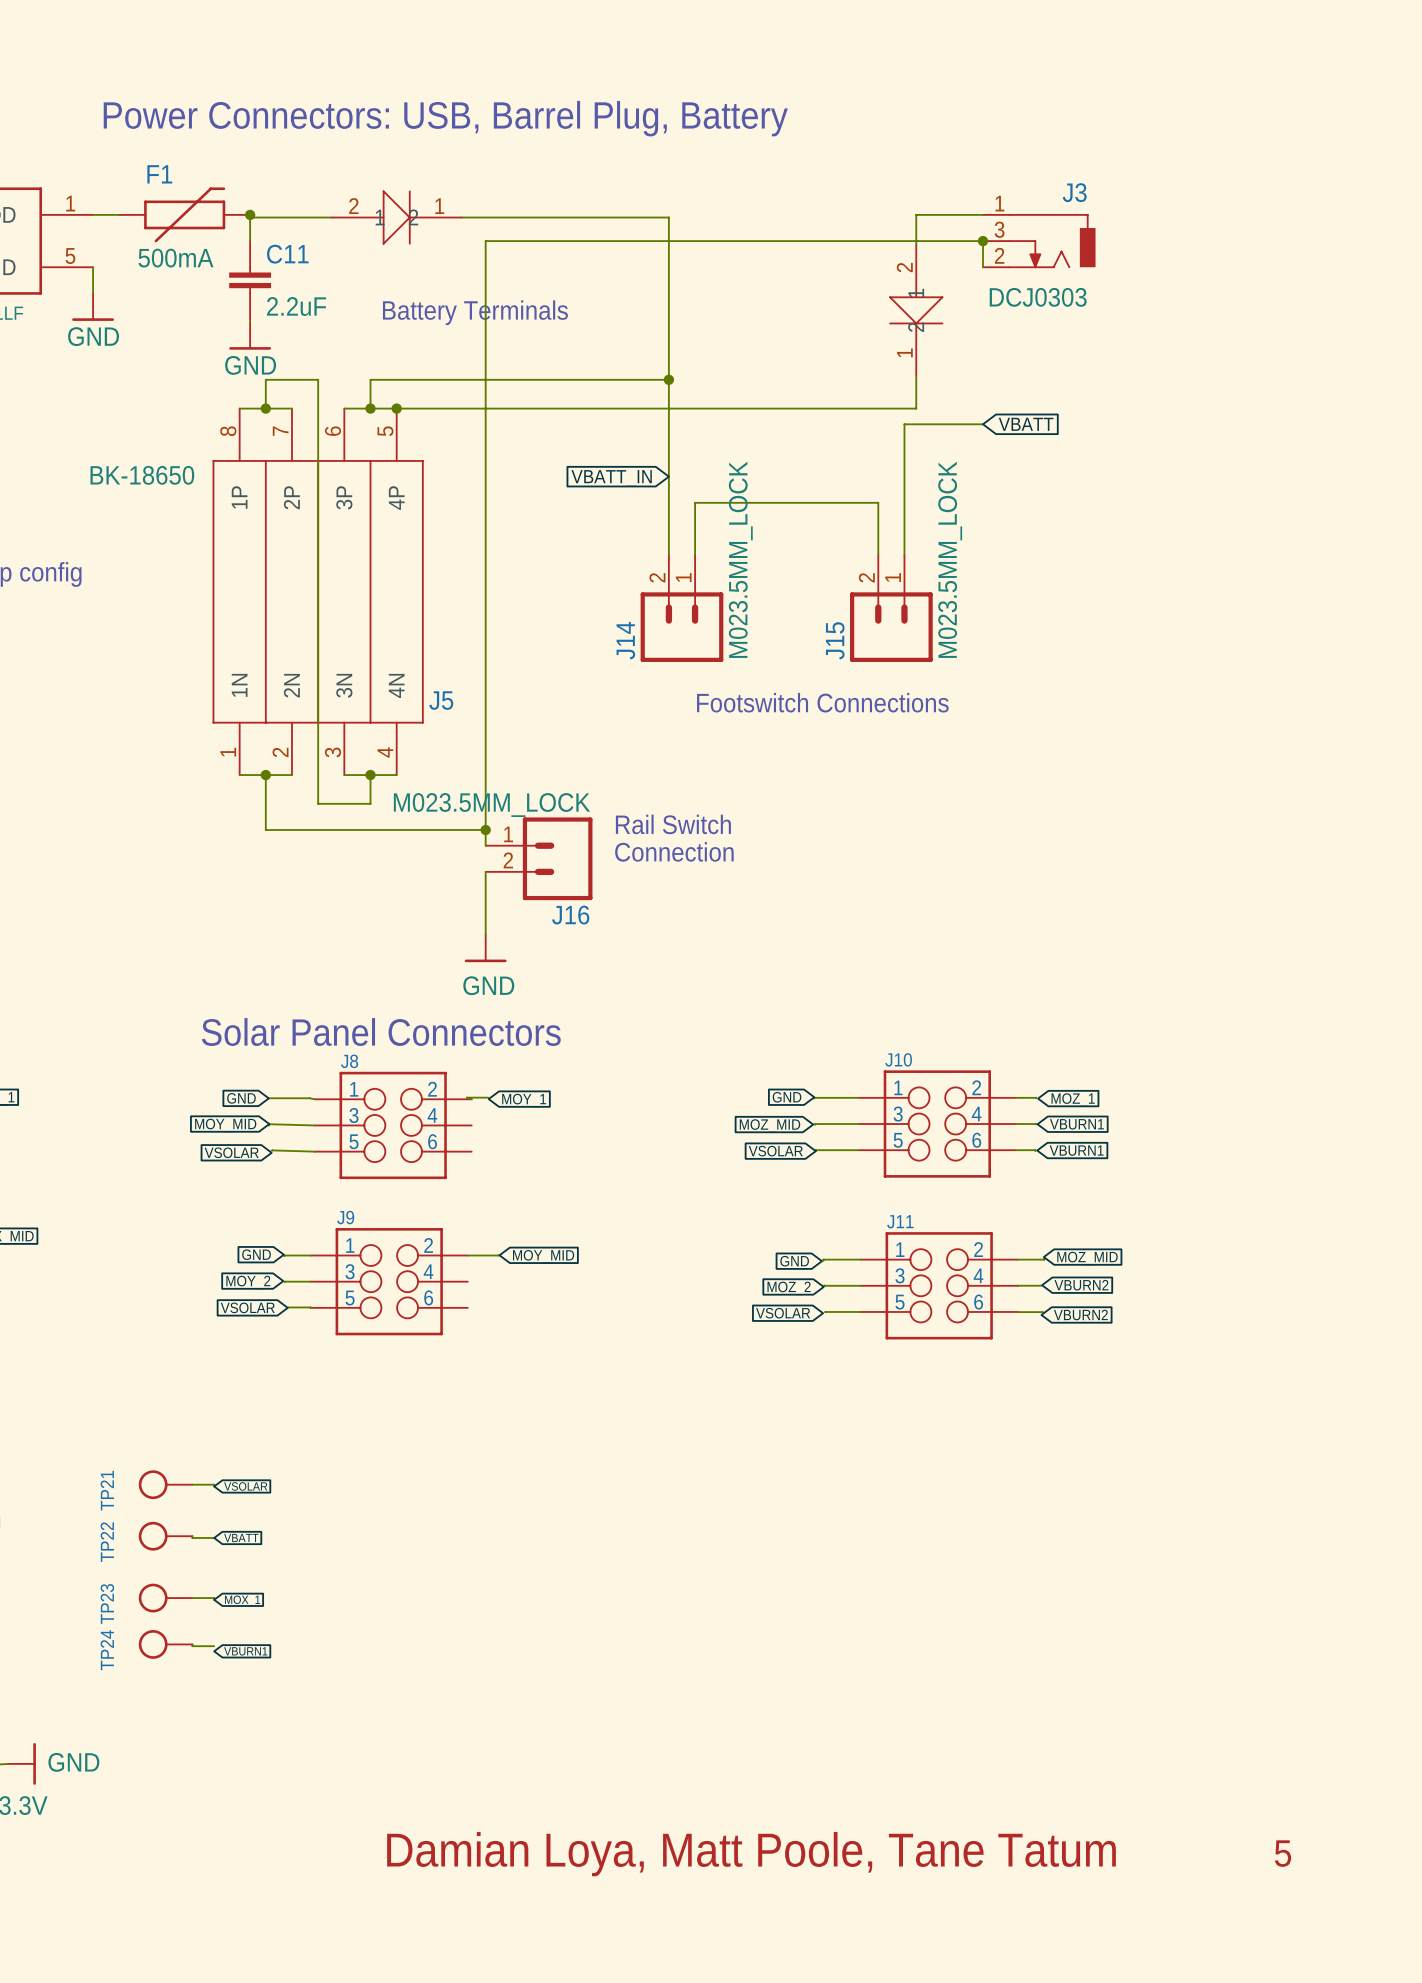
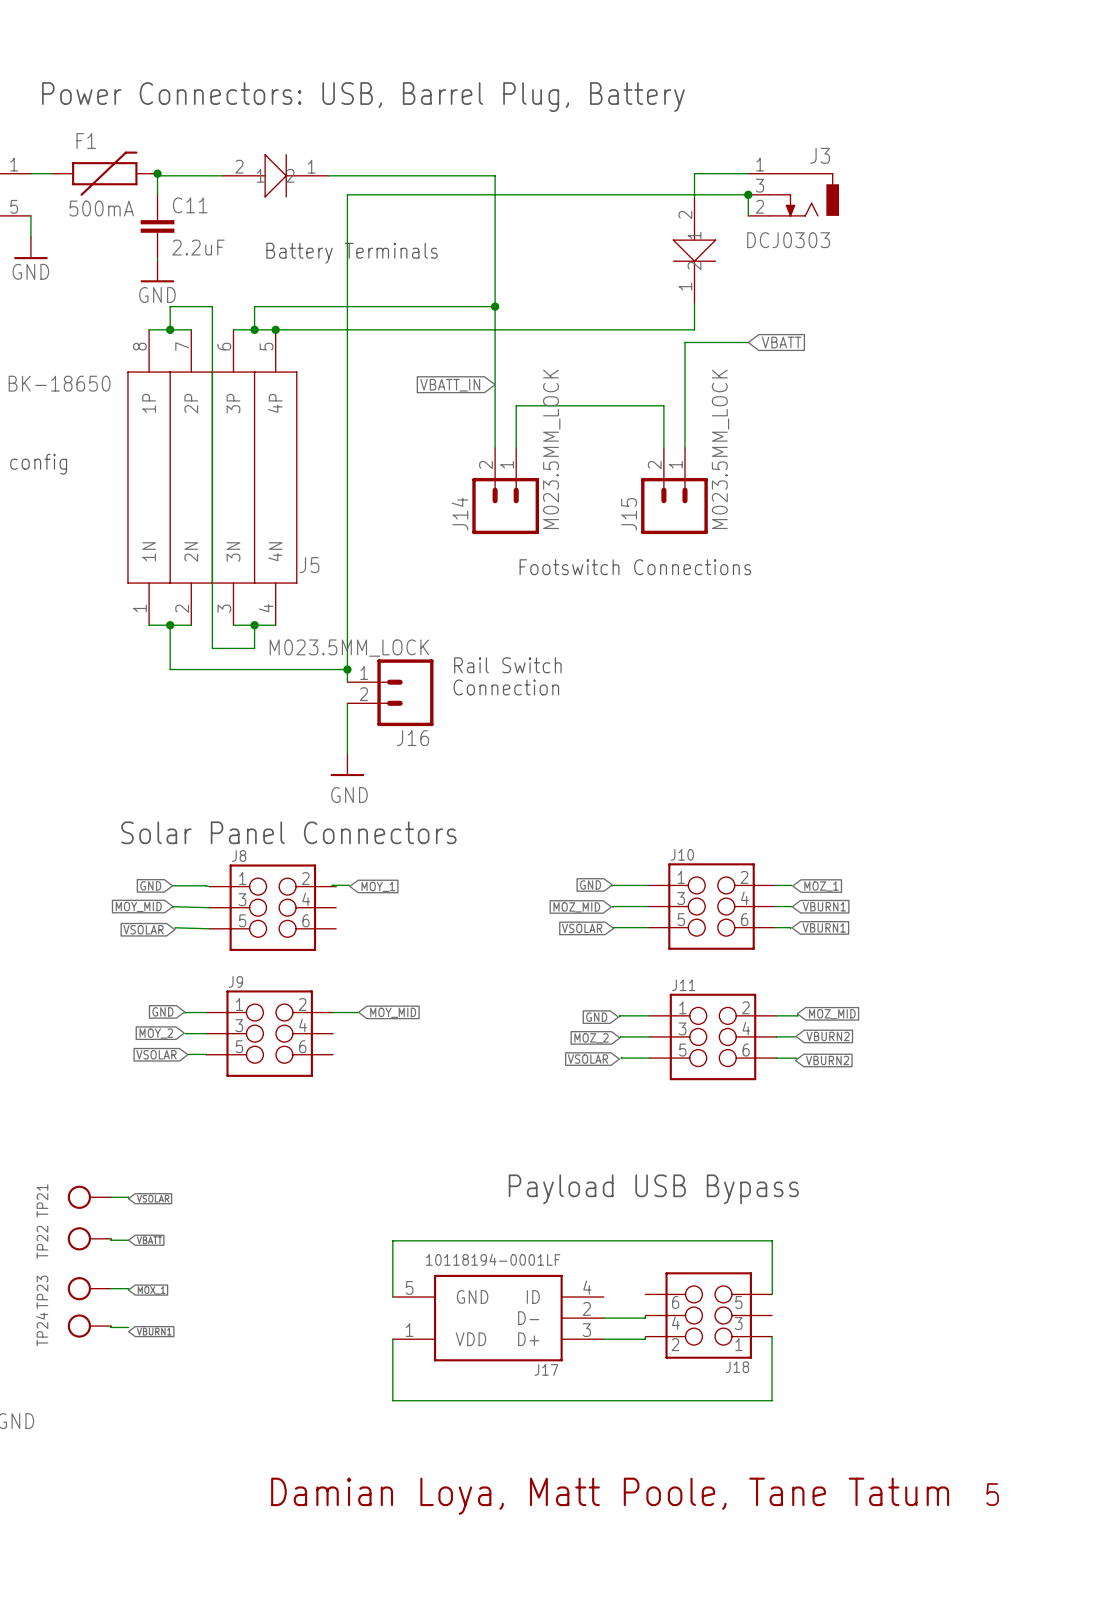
text: none -> Payload USB Bypass (653, 1189)
wire: none -> (772, 1294) (772, 1240) (392, 1240) (392, 1297)
wire: none -> (645, 1315) (645, 1318) (603, 1318)
J18: none -> (708, 1315)
J17: none -> 10118194-0001LF (498, 1318)
wire: none -> (645, 1336) (645, 1339) (603, 1339)
wire: none -> (772, 1336) (772, 1400) (392, 1400) (392, 1339)

